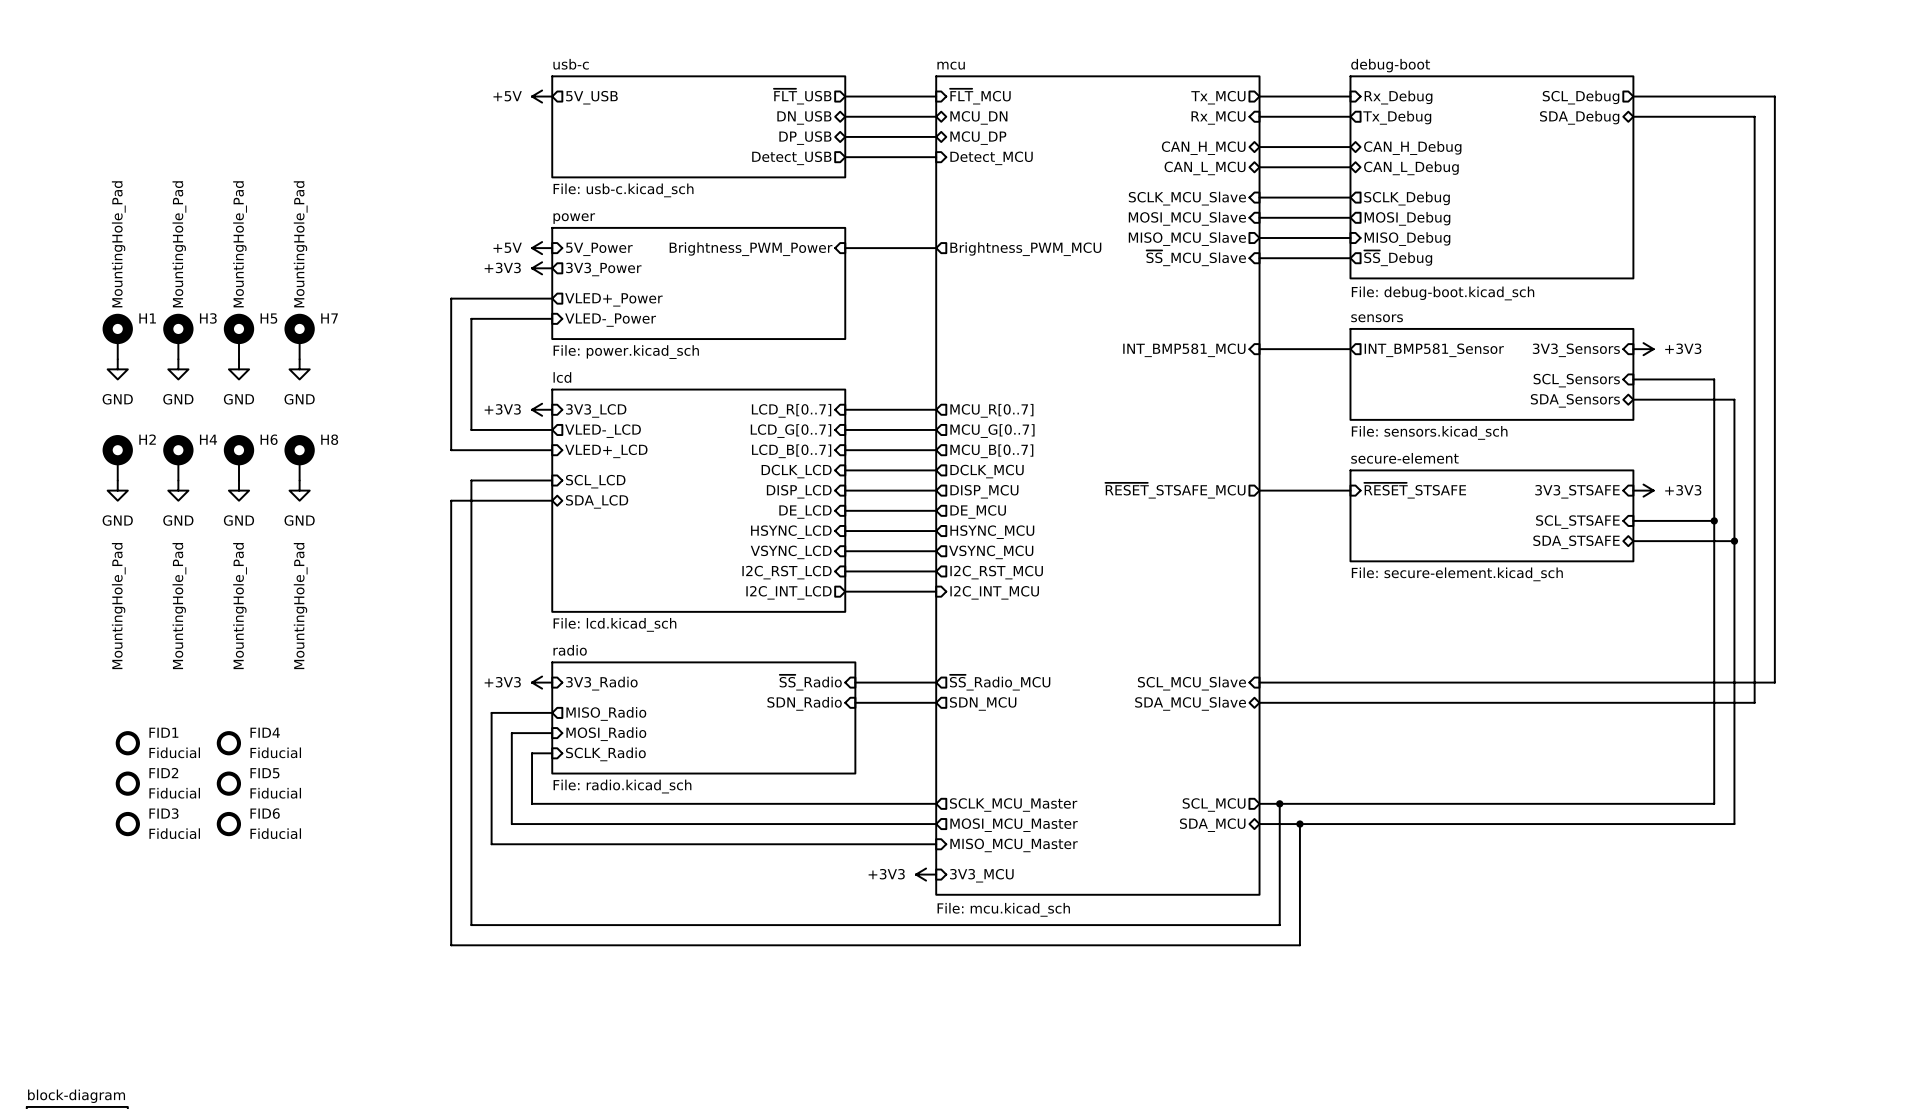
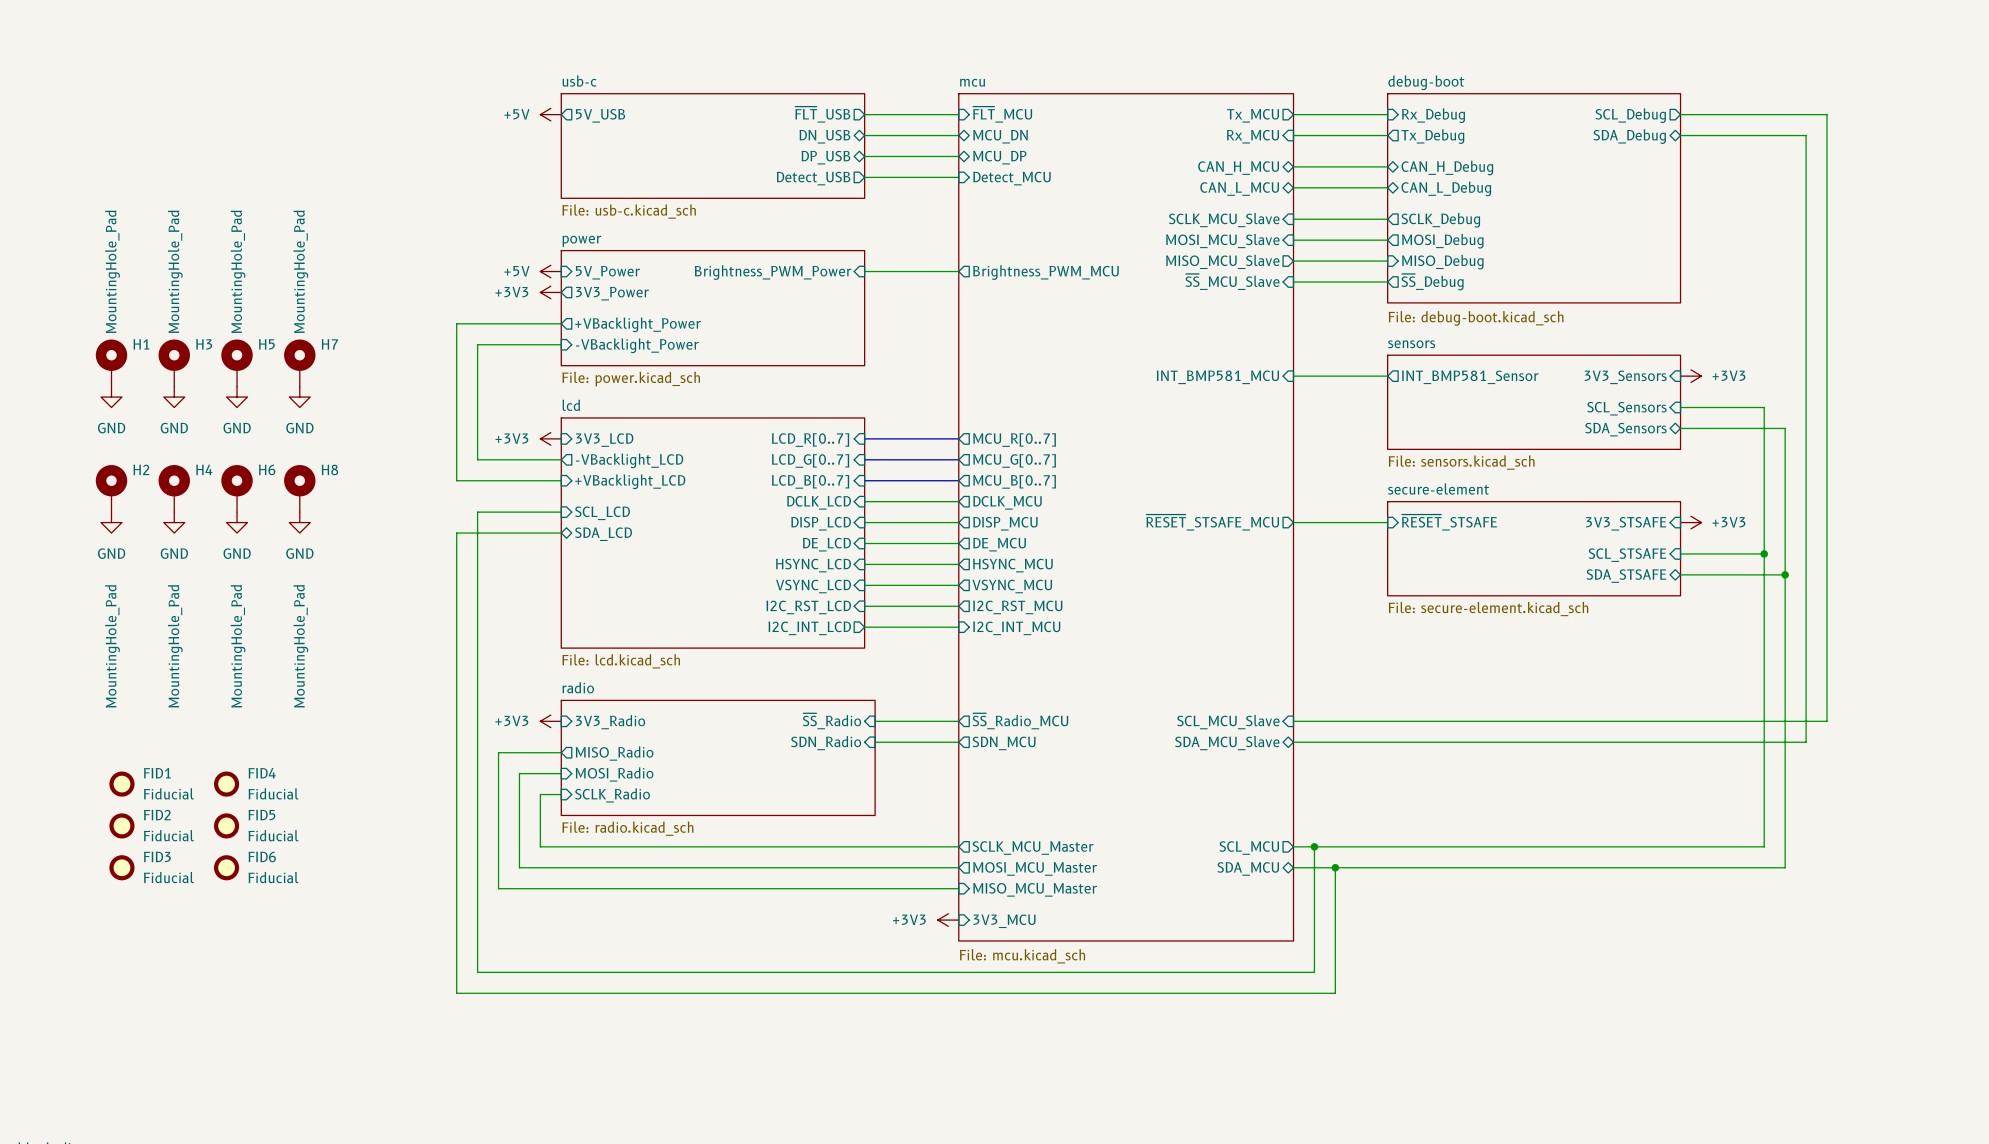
sheet pin: VLED+_Power (613, 299) -> +VBacklight_Power (638, 324)
sheet pin: VLED-_Power (610, 320) -> -VBacklight_Power (637, 345)
sheet pin: VLED-_LCD (603, 431) -> -VBacklight_LCD (629, 460)
sheet pin: VLED+_LCD (606, 451) -> +VBacklight_LCD (630, 481)

